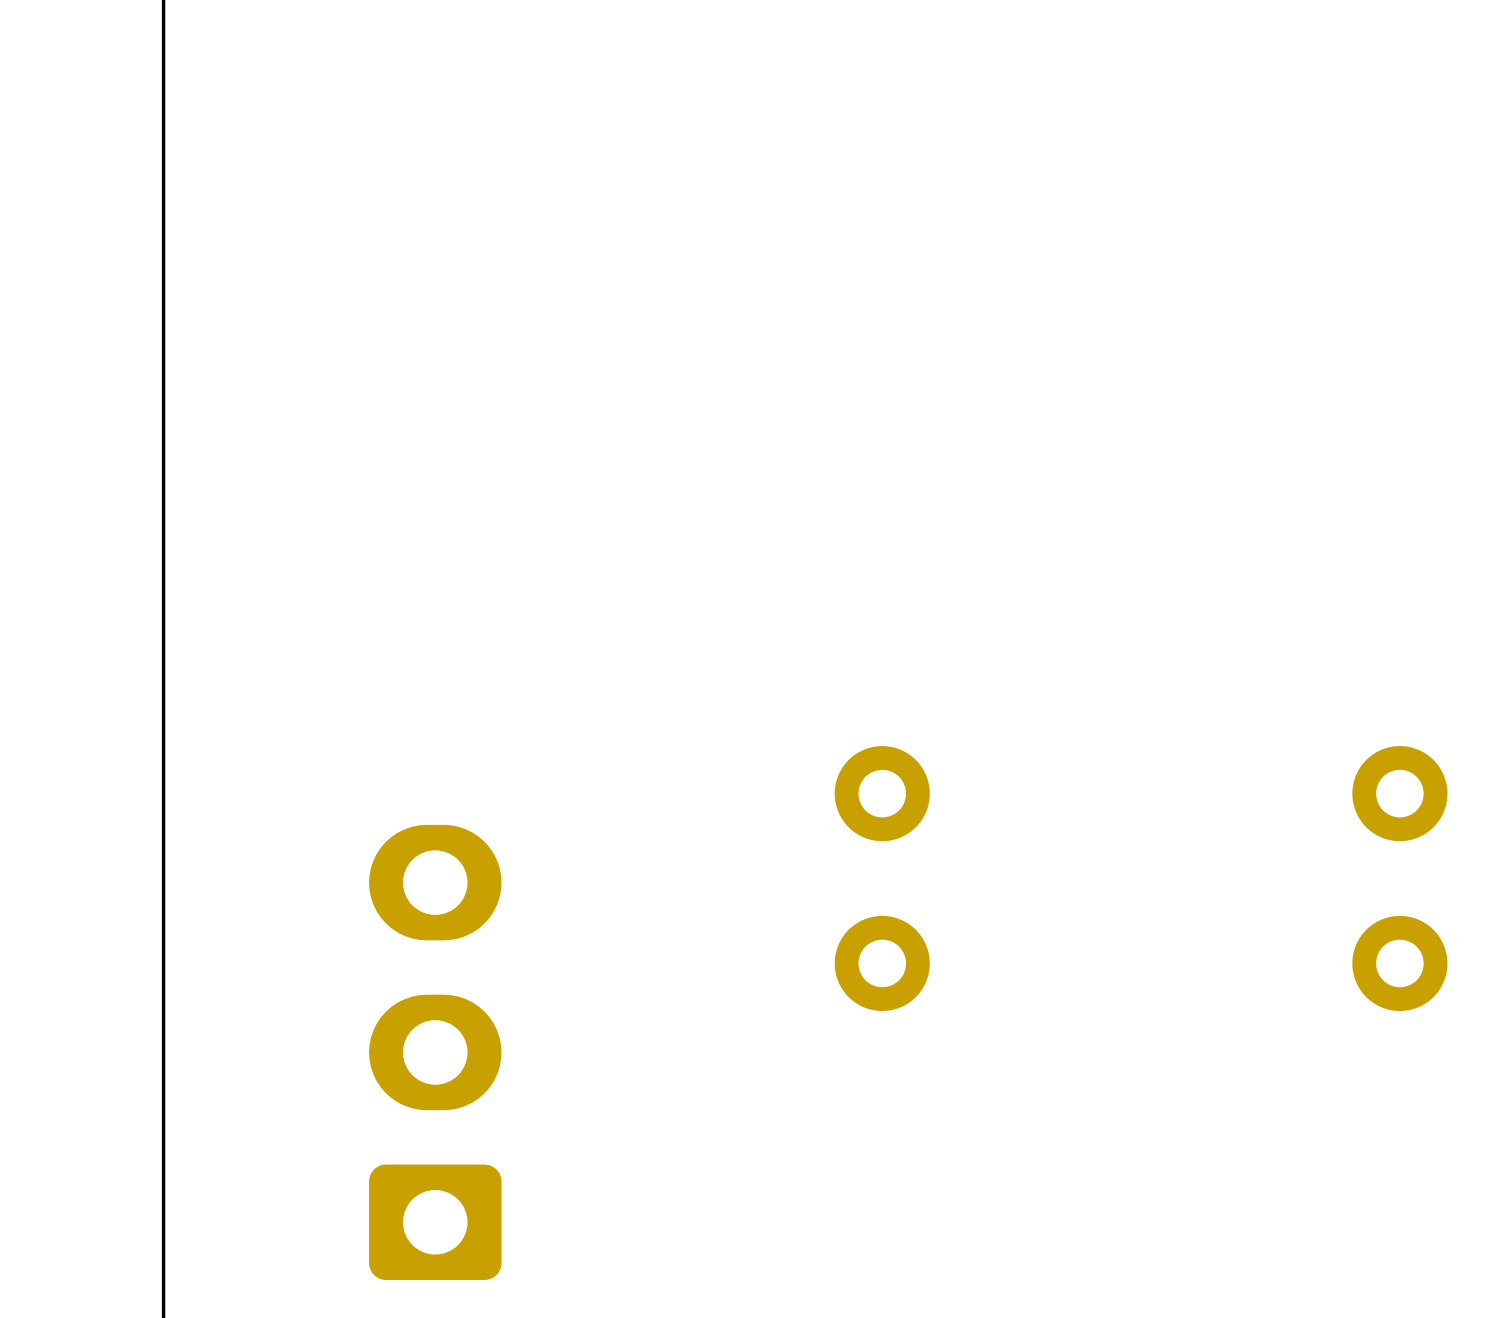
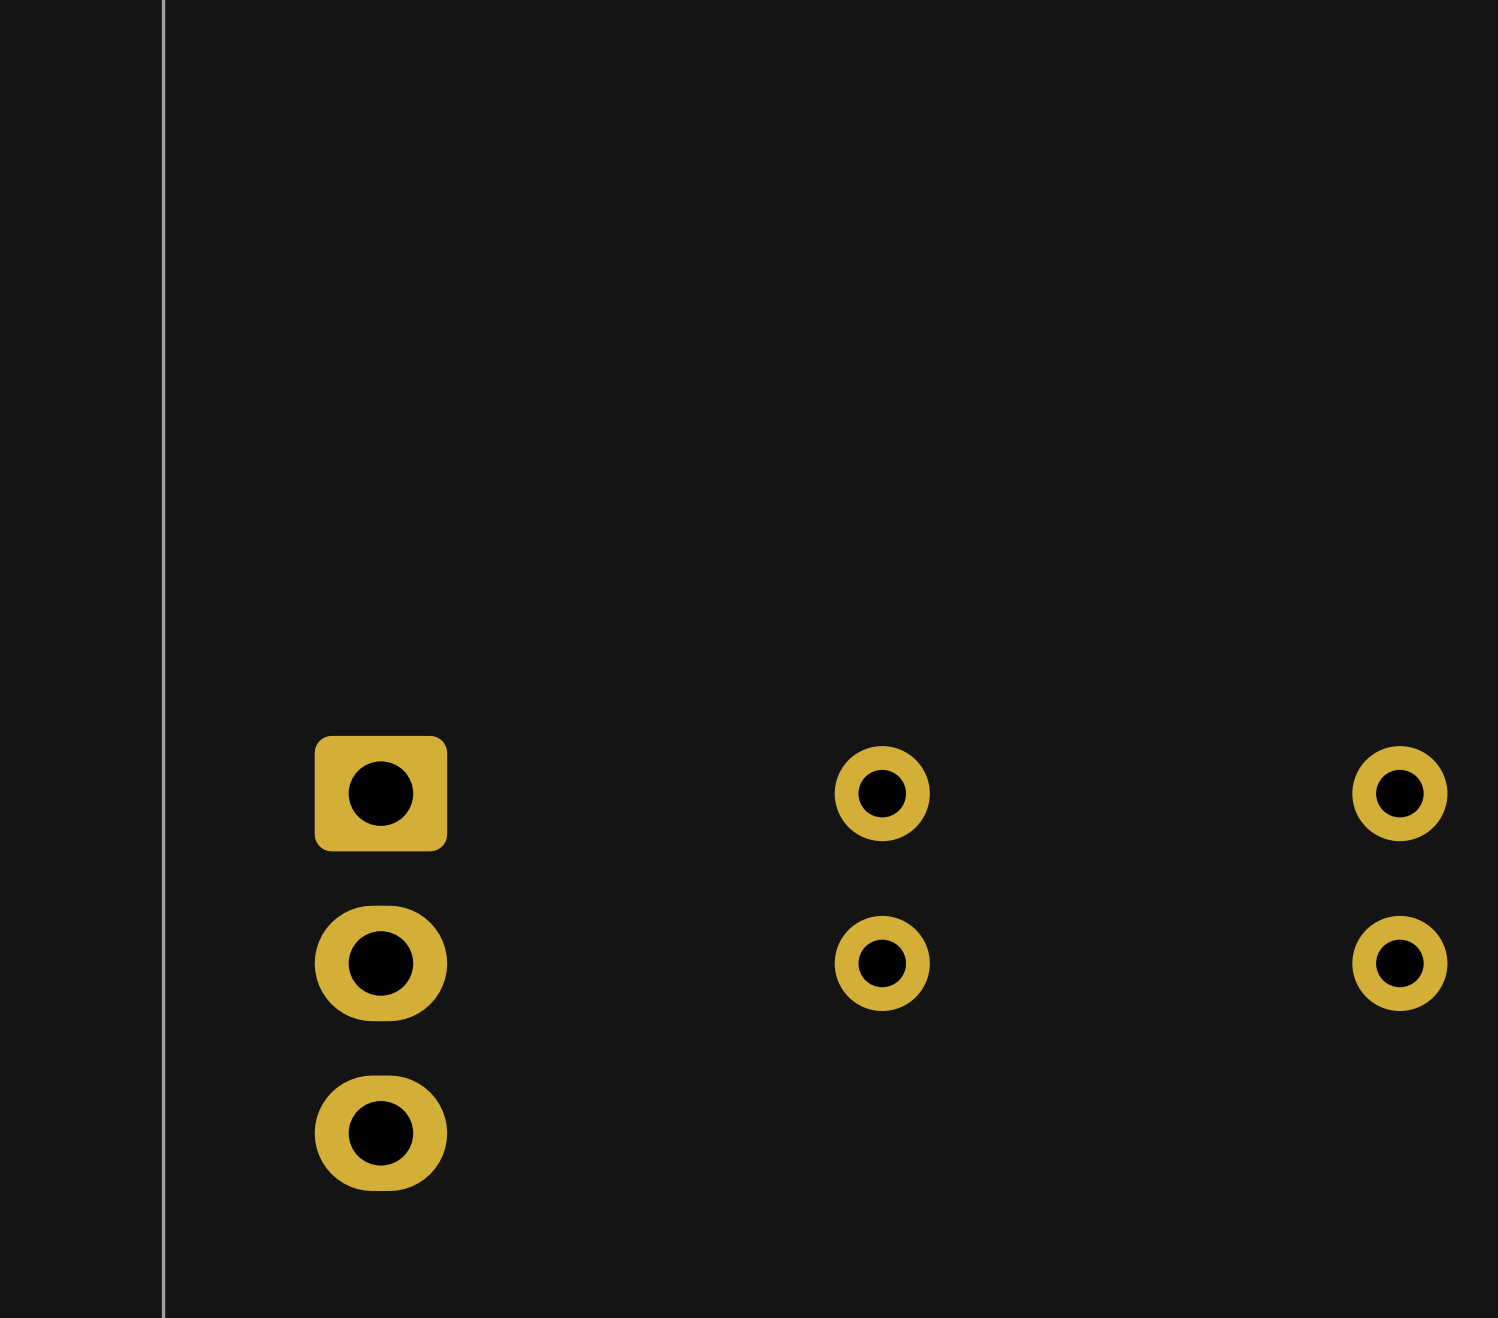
part rotation: 0° (435, 1052) -> 180° (380, 963)

